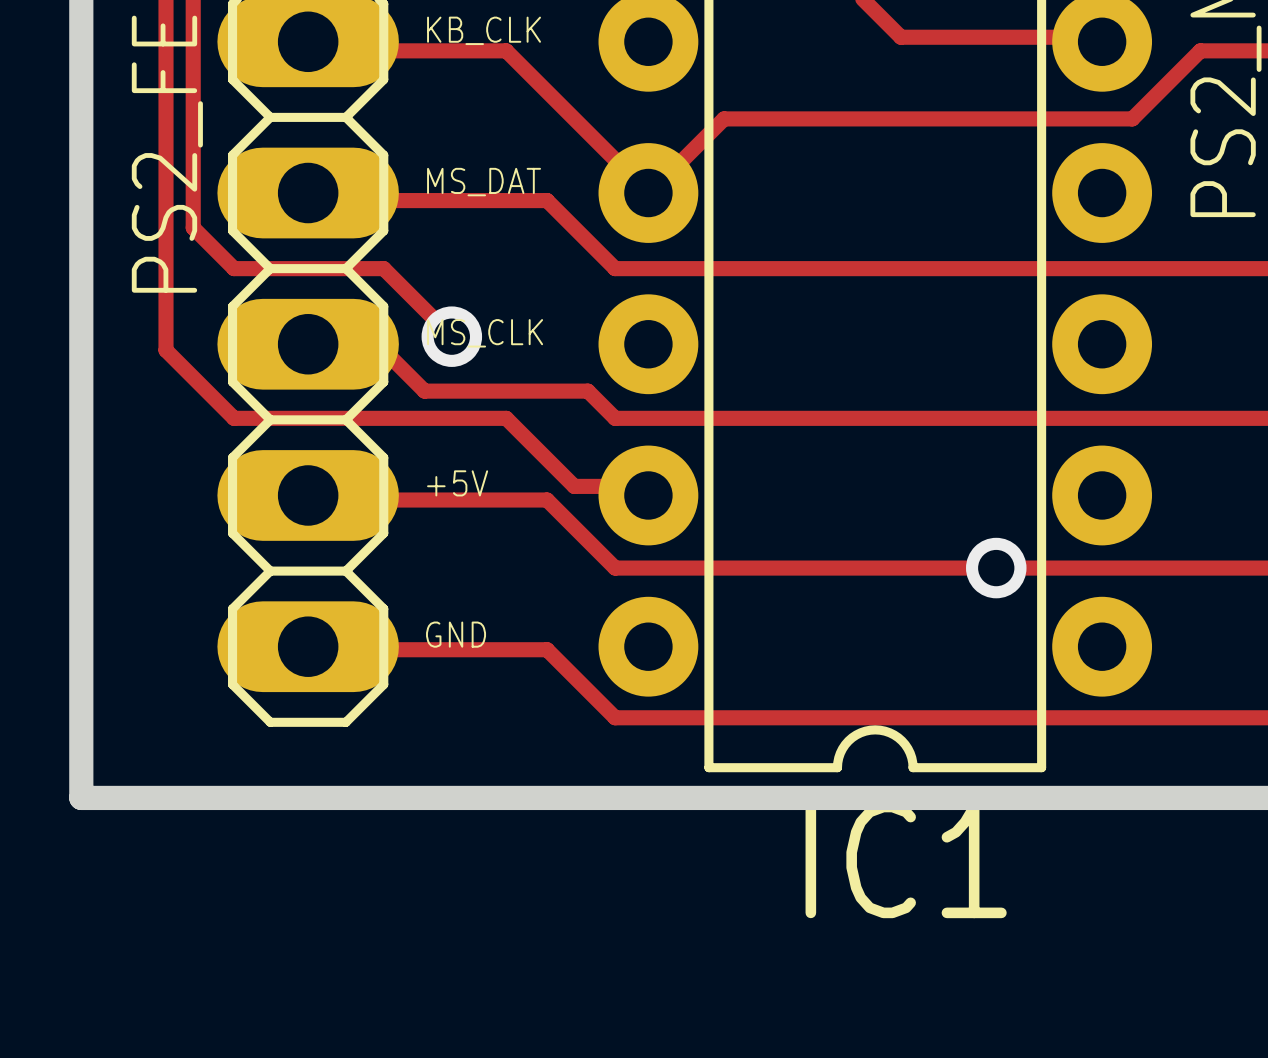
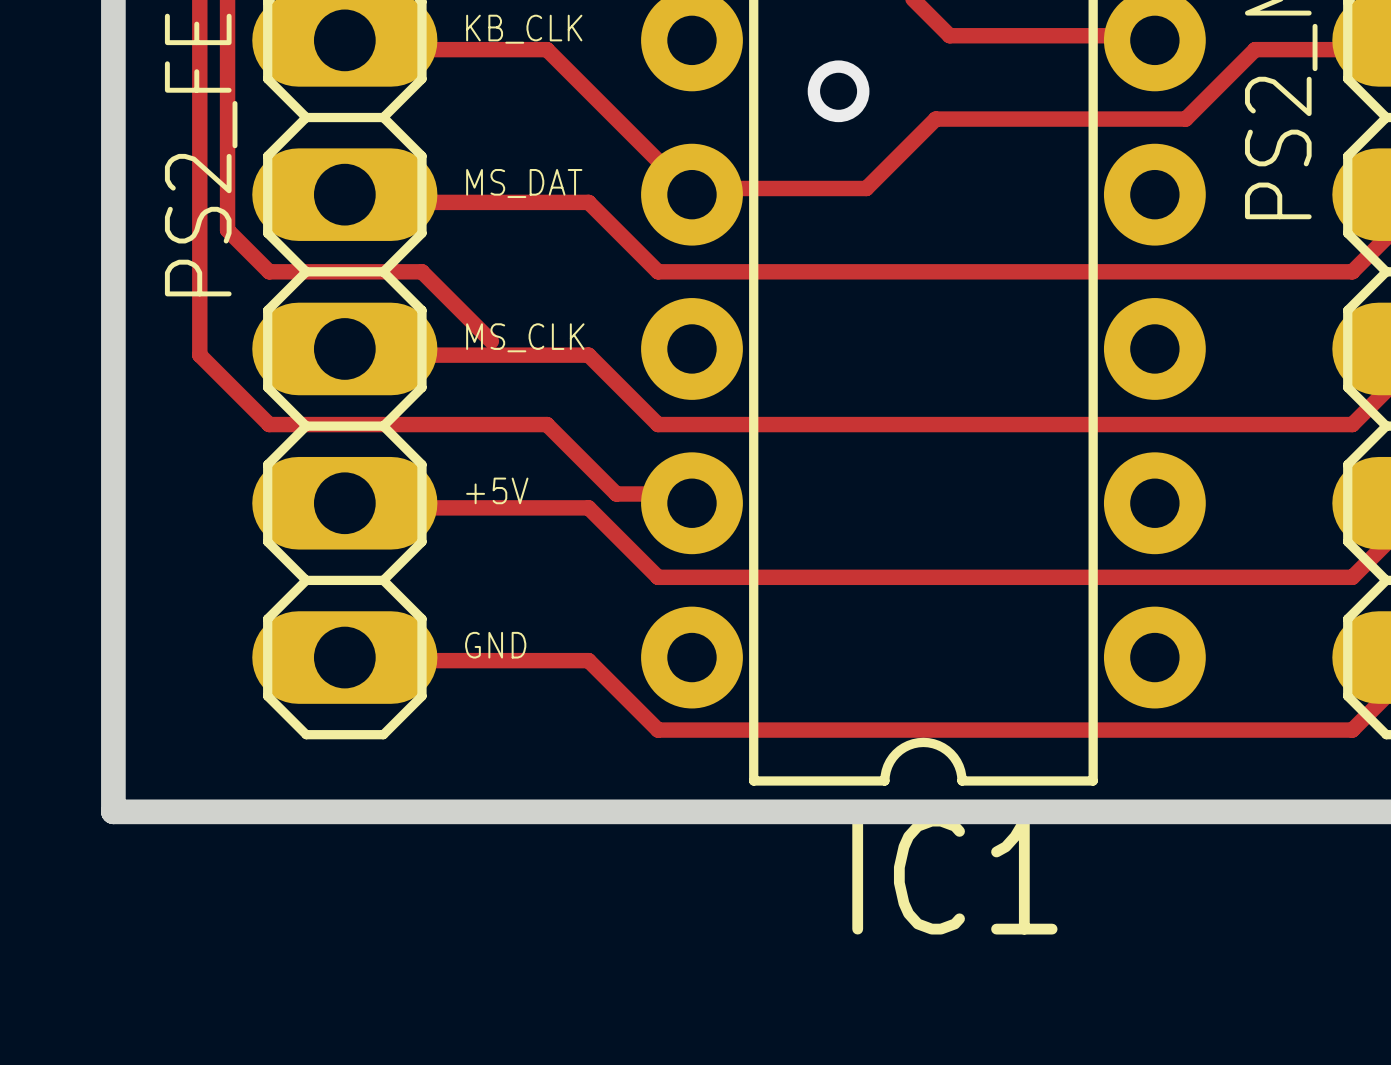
via: none -> (838, 91)
track: (887, 118) (724, 118) (655, 186) -> (935, 119) (866, 188) (699, 188)
via: (451, 336) -> none
track: (383, 350) (424, 391) (587, 391) -> (421, 355) (588, 355) (630, 396)
via: (996, 568) -> none

